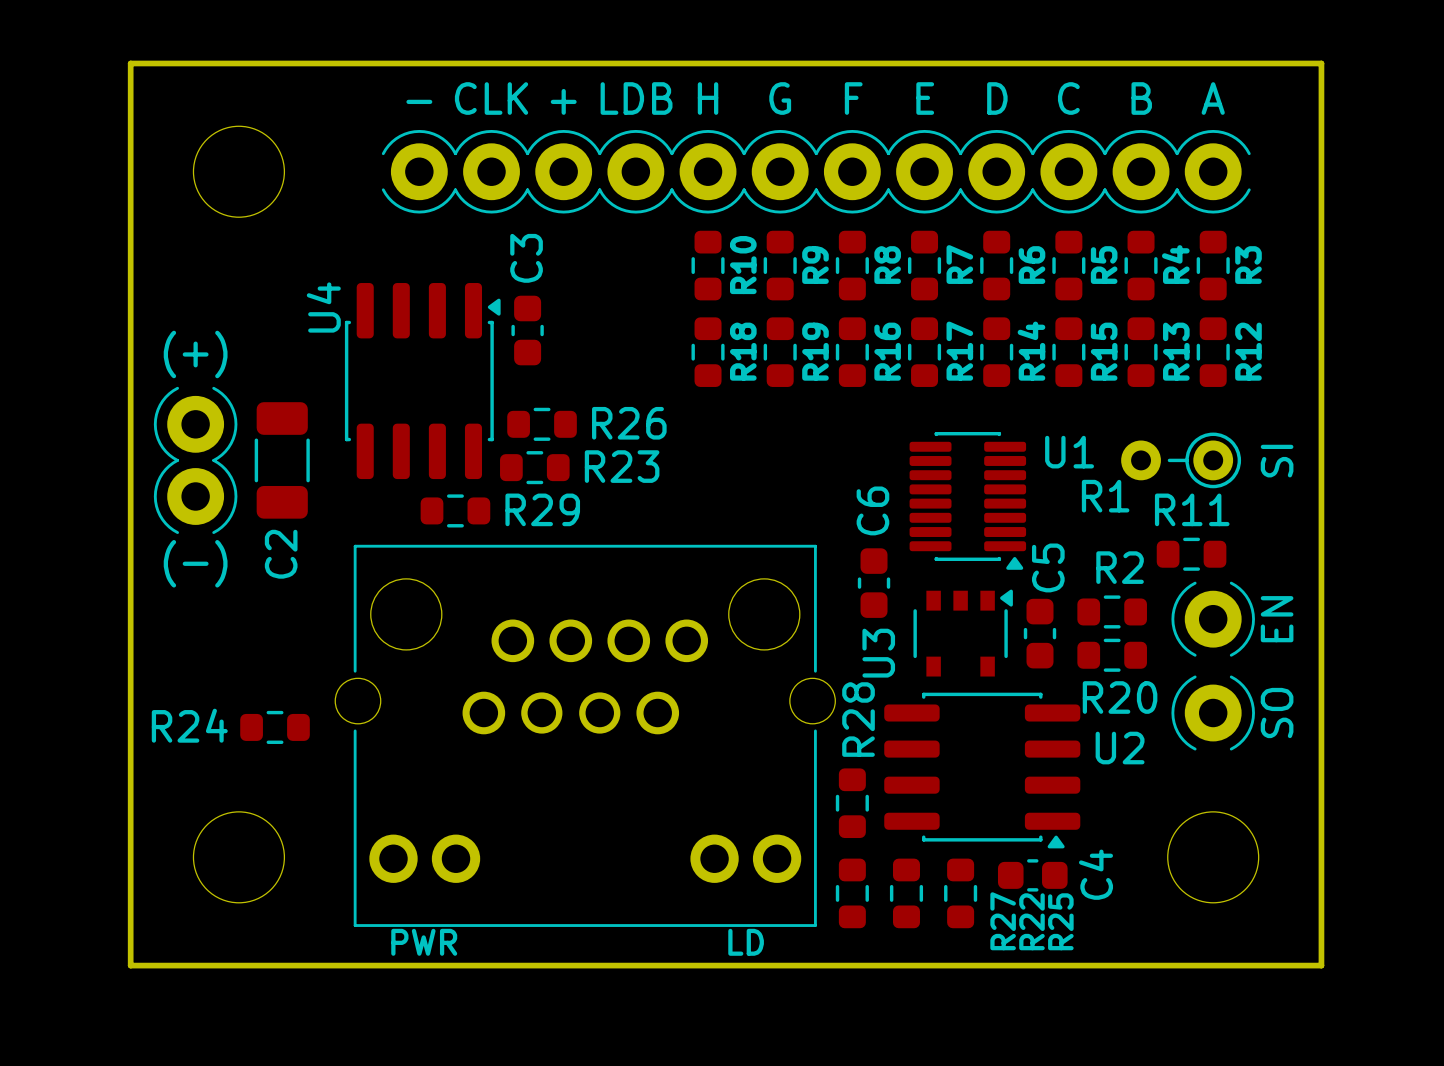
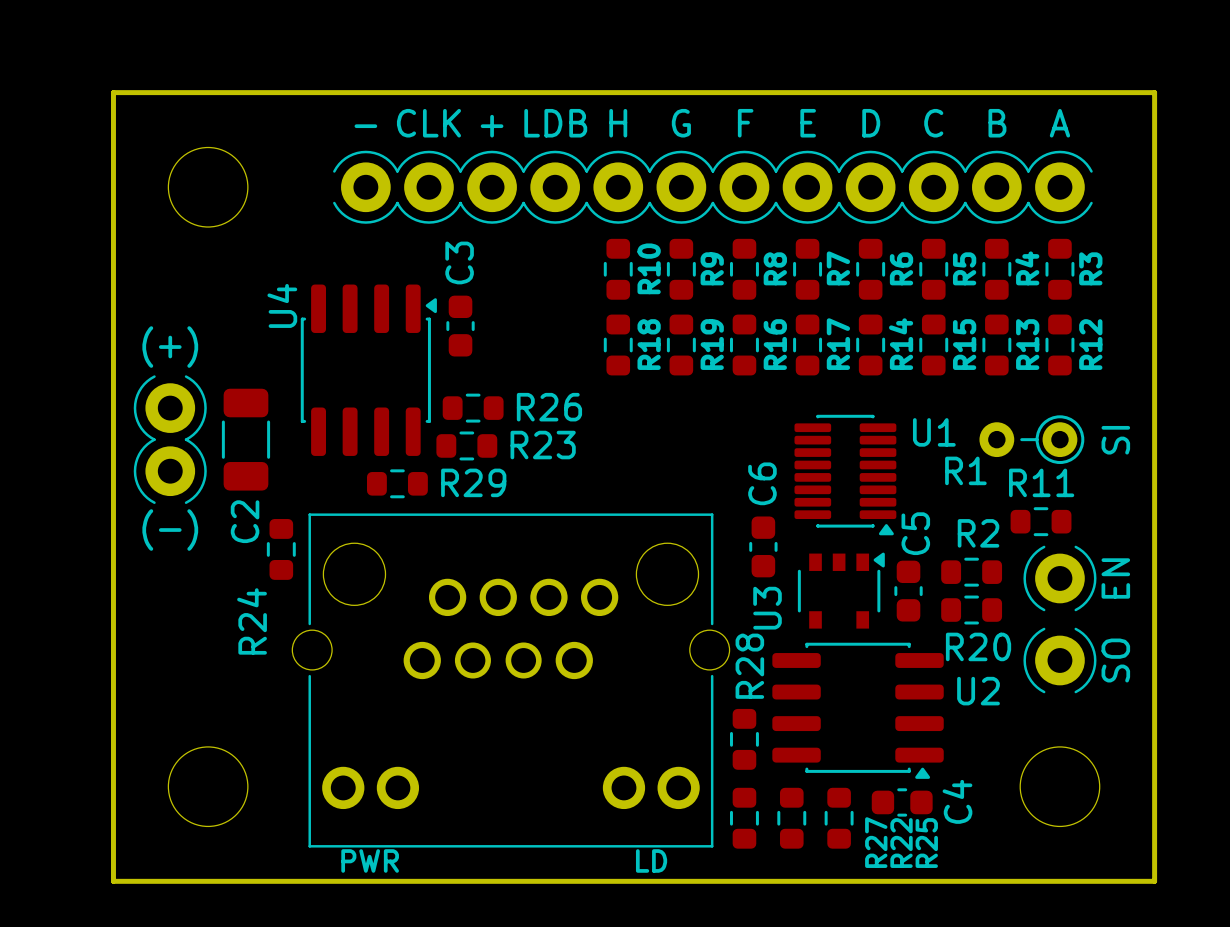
R24 name position: R24 (189, 725) -> R24 (252, 621)
R24 rotation: 0° (275, 727) -> 90° clockwise (281, 549)
R24 position: (275, 727) -> (281, 549)

